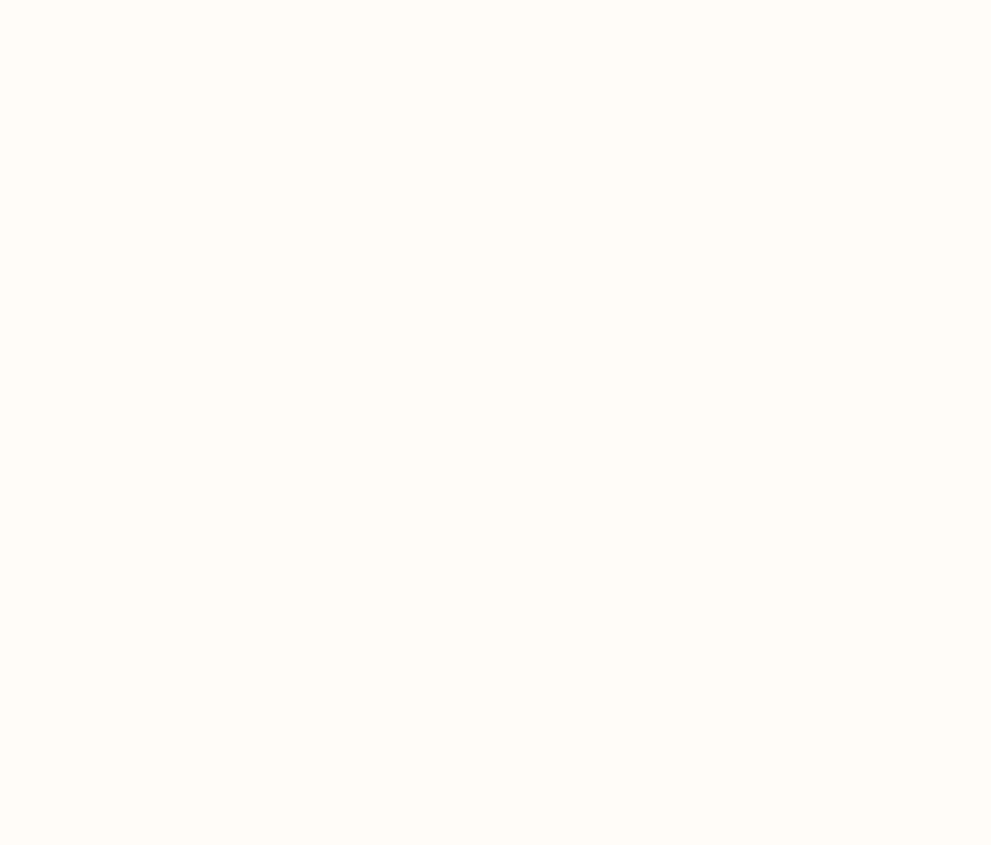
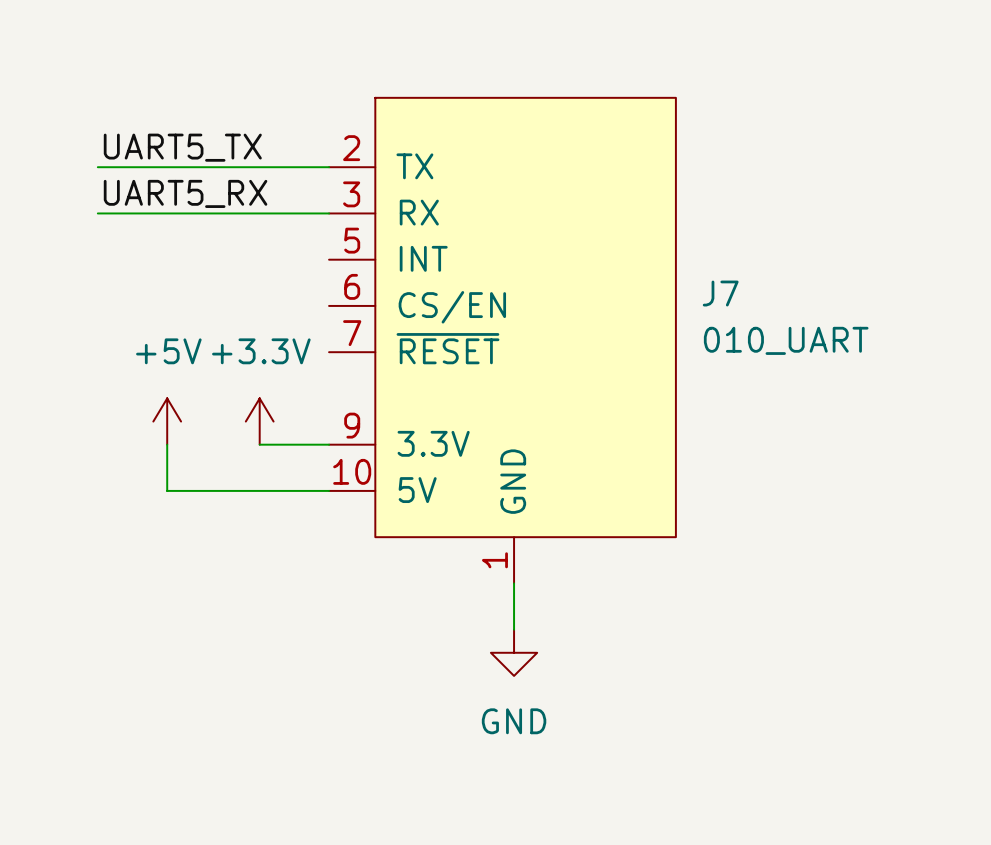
label: none -> UART5_TX (182, 147)
wire: none -> (97, 167) (329, 167)
label: none -> UART5_RX (185, 193)
wire: none -> (97, 213) (329, 213)
J7: none -> 010_UART (502, 340)
power symbol: none -> +5V (167, 421)
power symbol: none -> +3.3V (259, 421)
wire: none -> (167, 444) (167, 490) (329, 490)
wire: none -> (259, 444) (329, 444)
wire: none -> (514, 583) (514, 629)
power symbol: none -> GND (514, 652)

